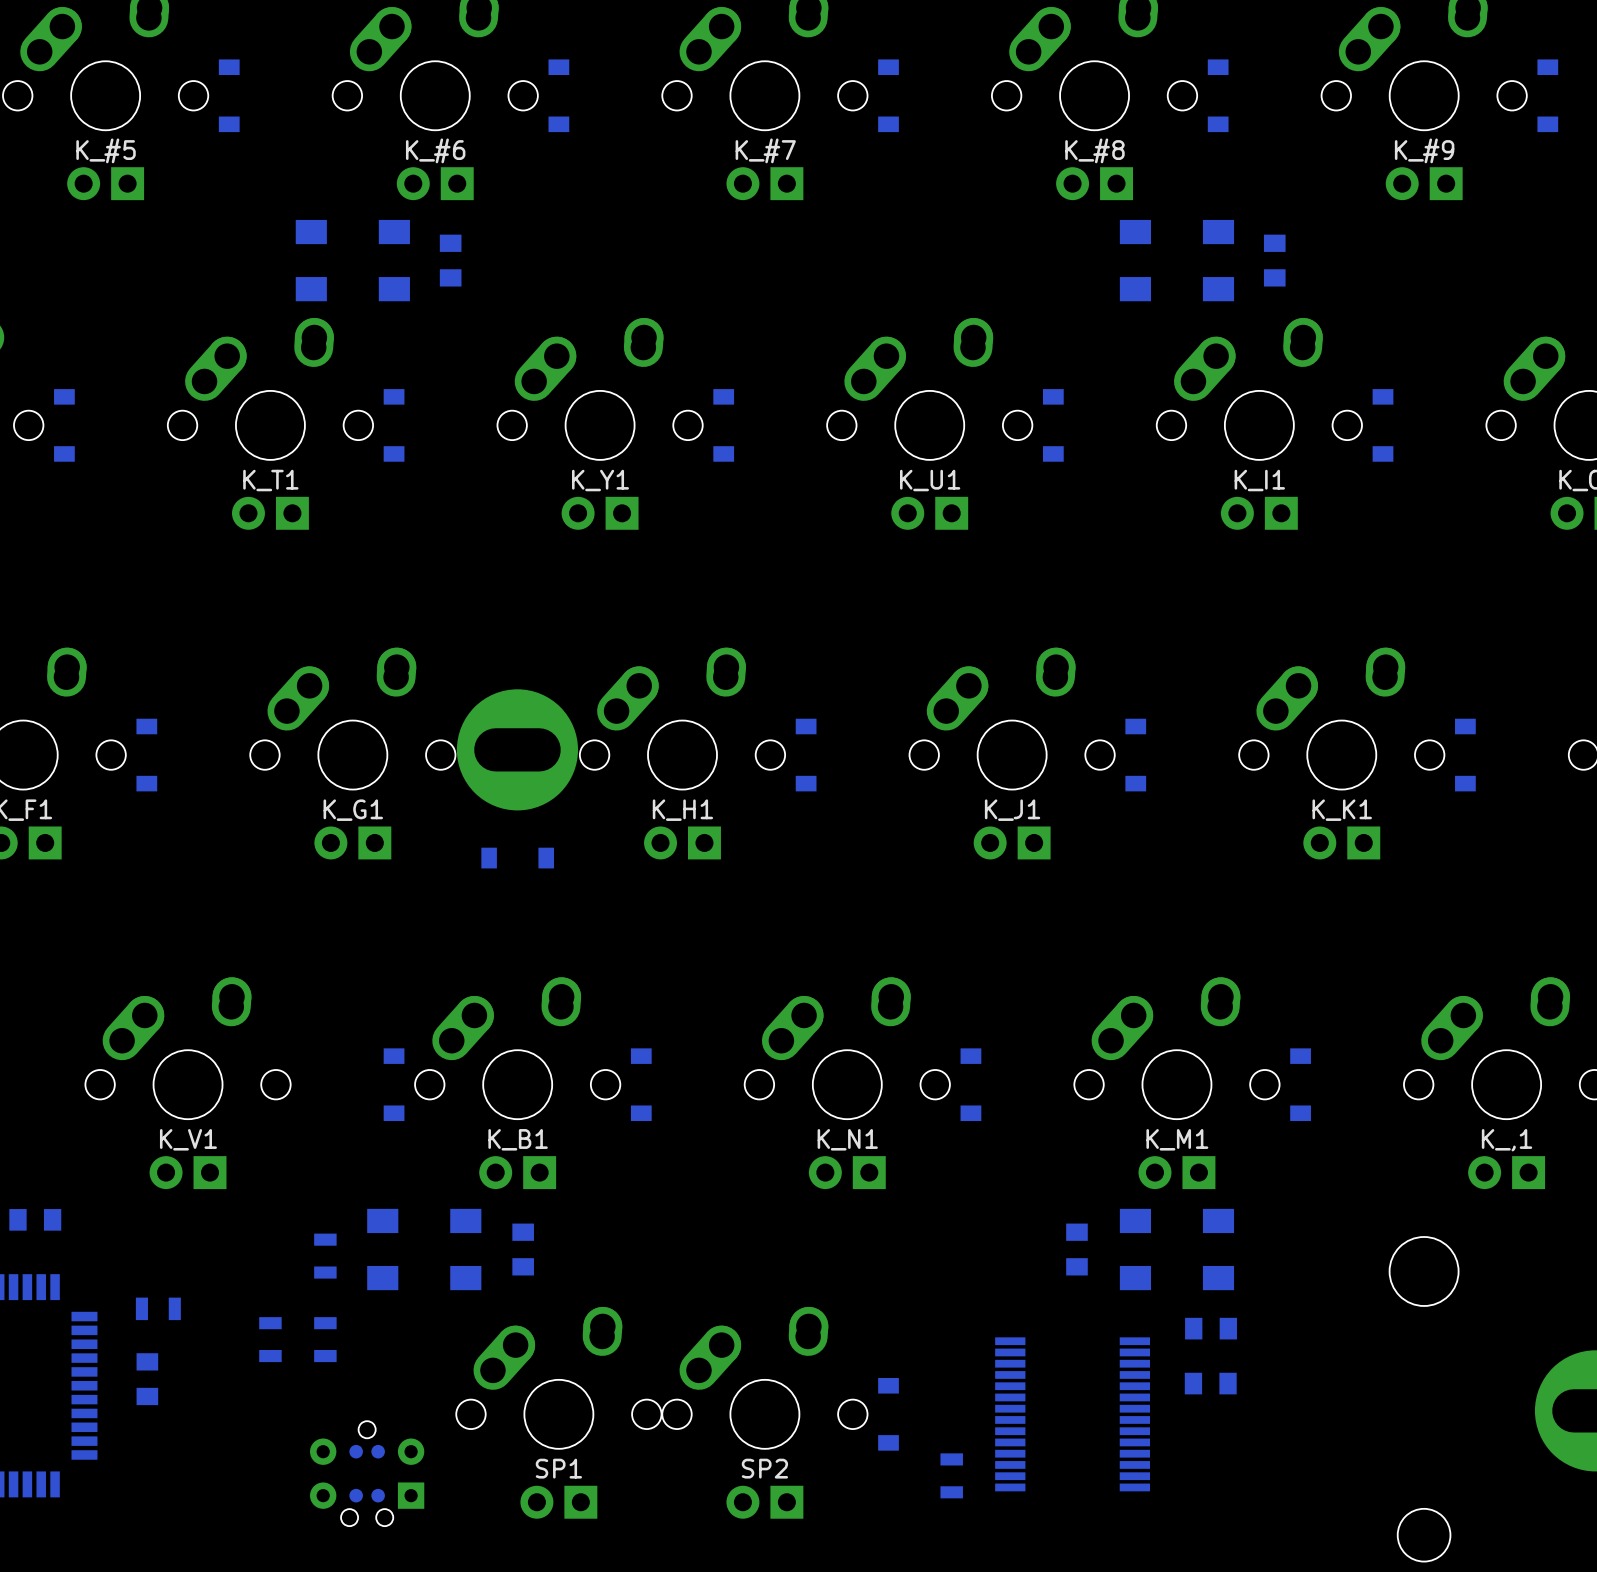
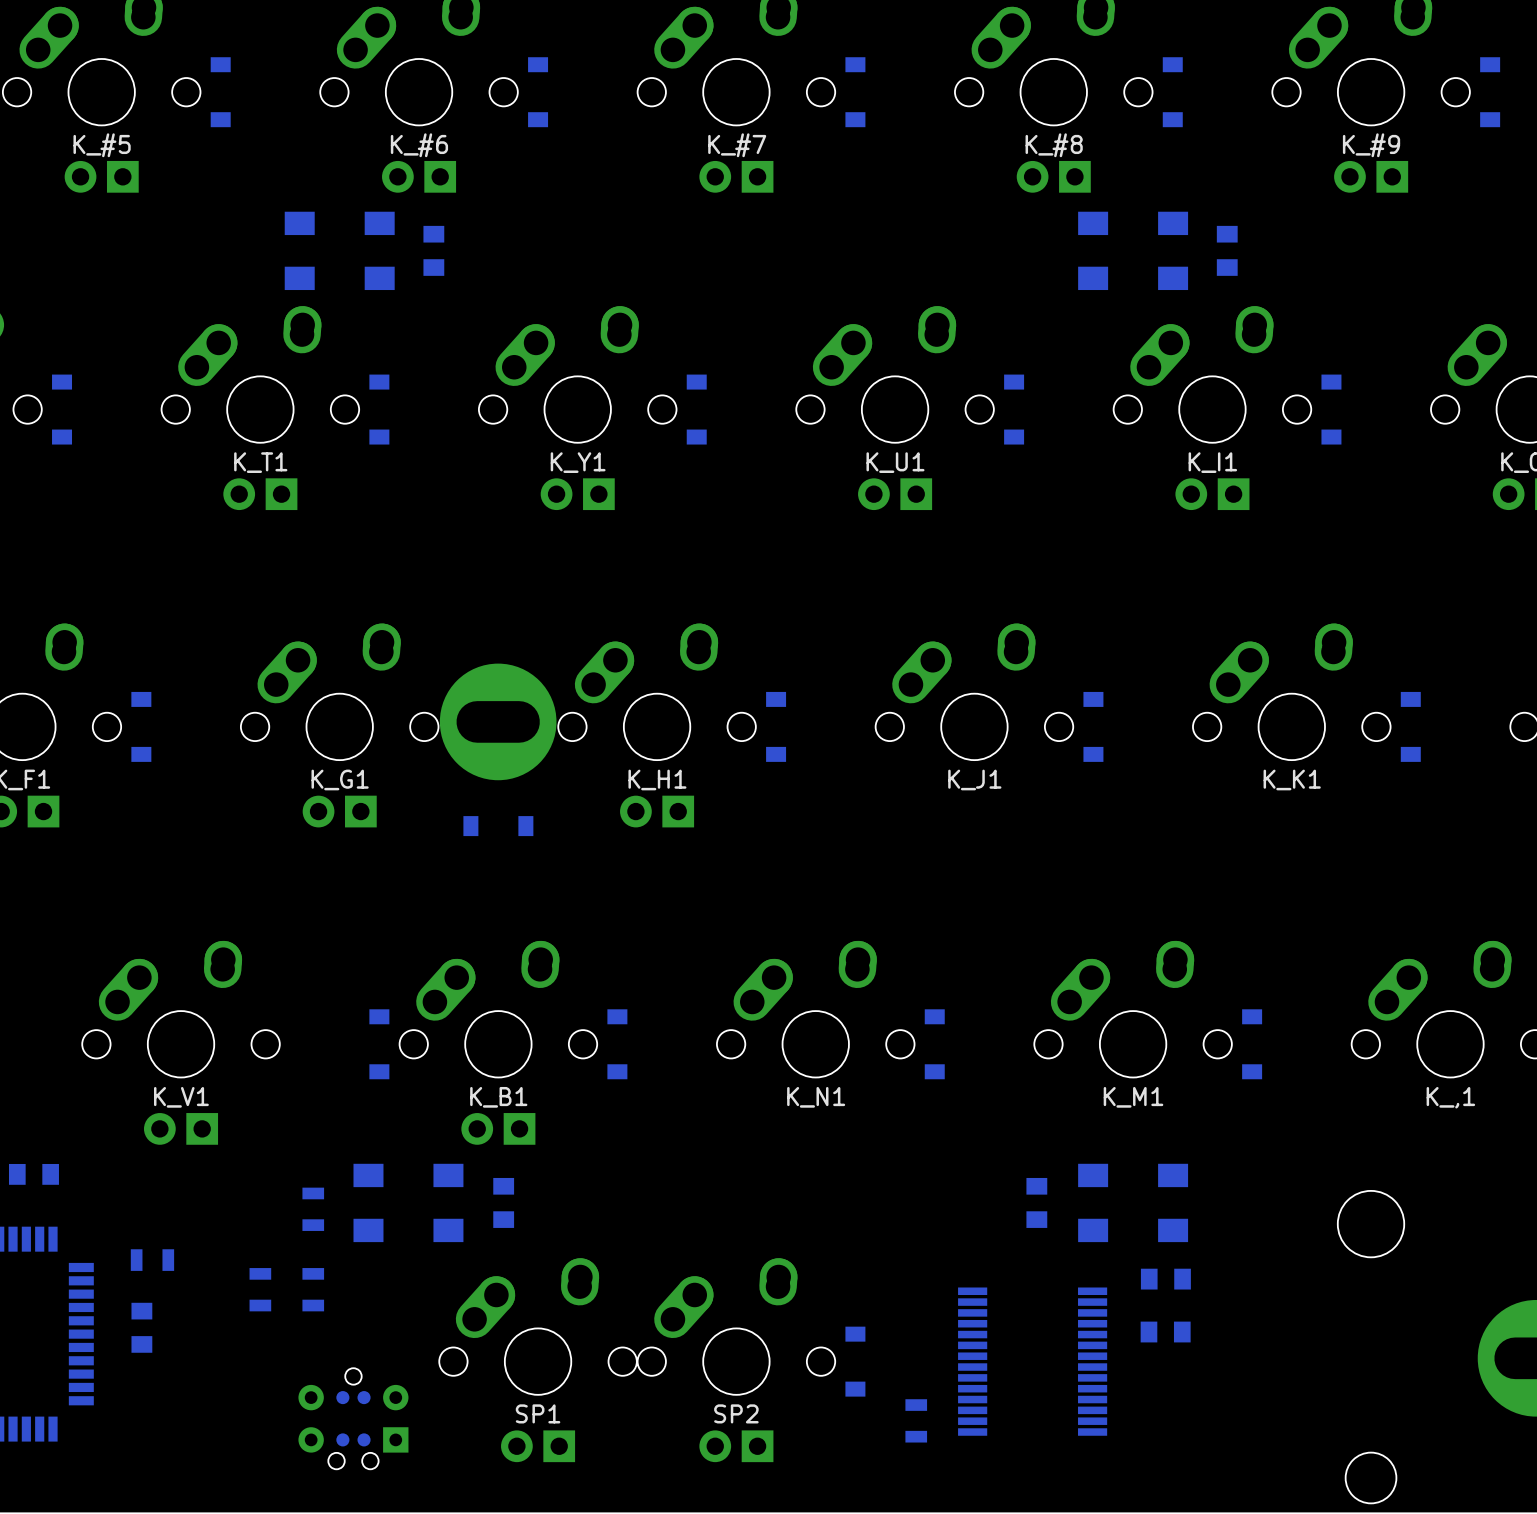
part: (1012, 842) -> none
part: (1341, 842) -> none
part: (847, 1172) -> none
part: (1176, 1172) -> none
part: (1506, 1172) -> none

